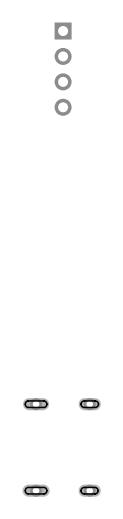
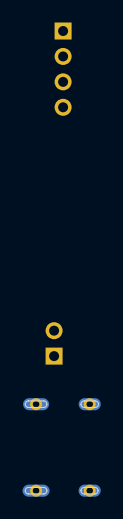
part: none -> (54, 343)

